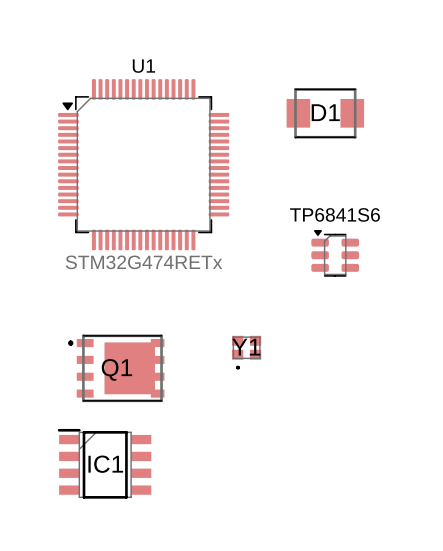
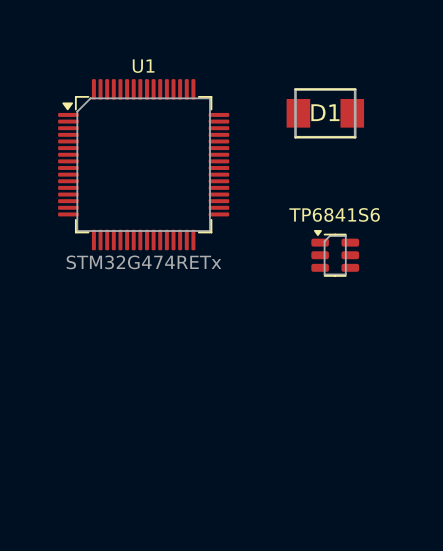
Y1: (246, 352) -> none
Q1: (116, 368) -> none
IC1: (104, 463) -> none

